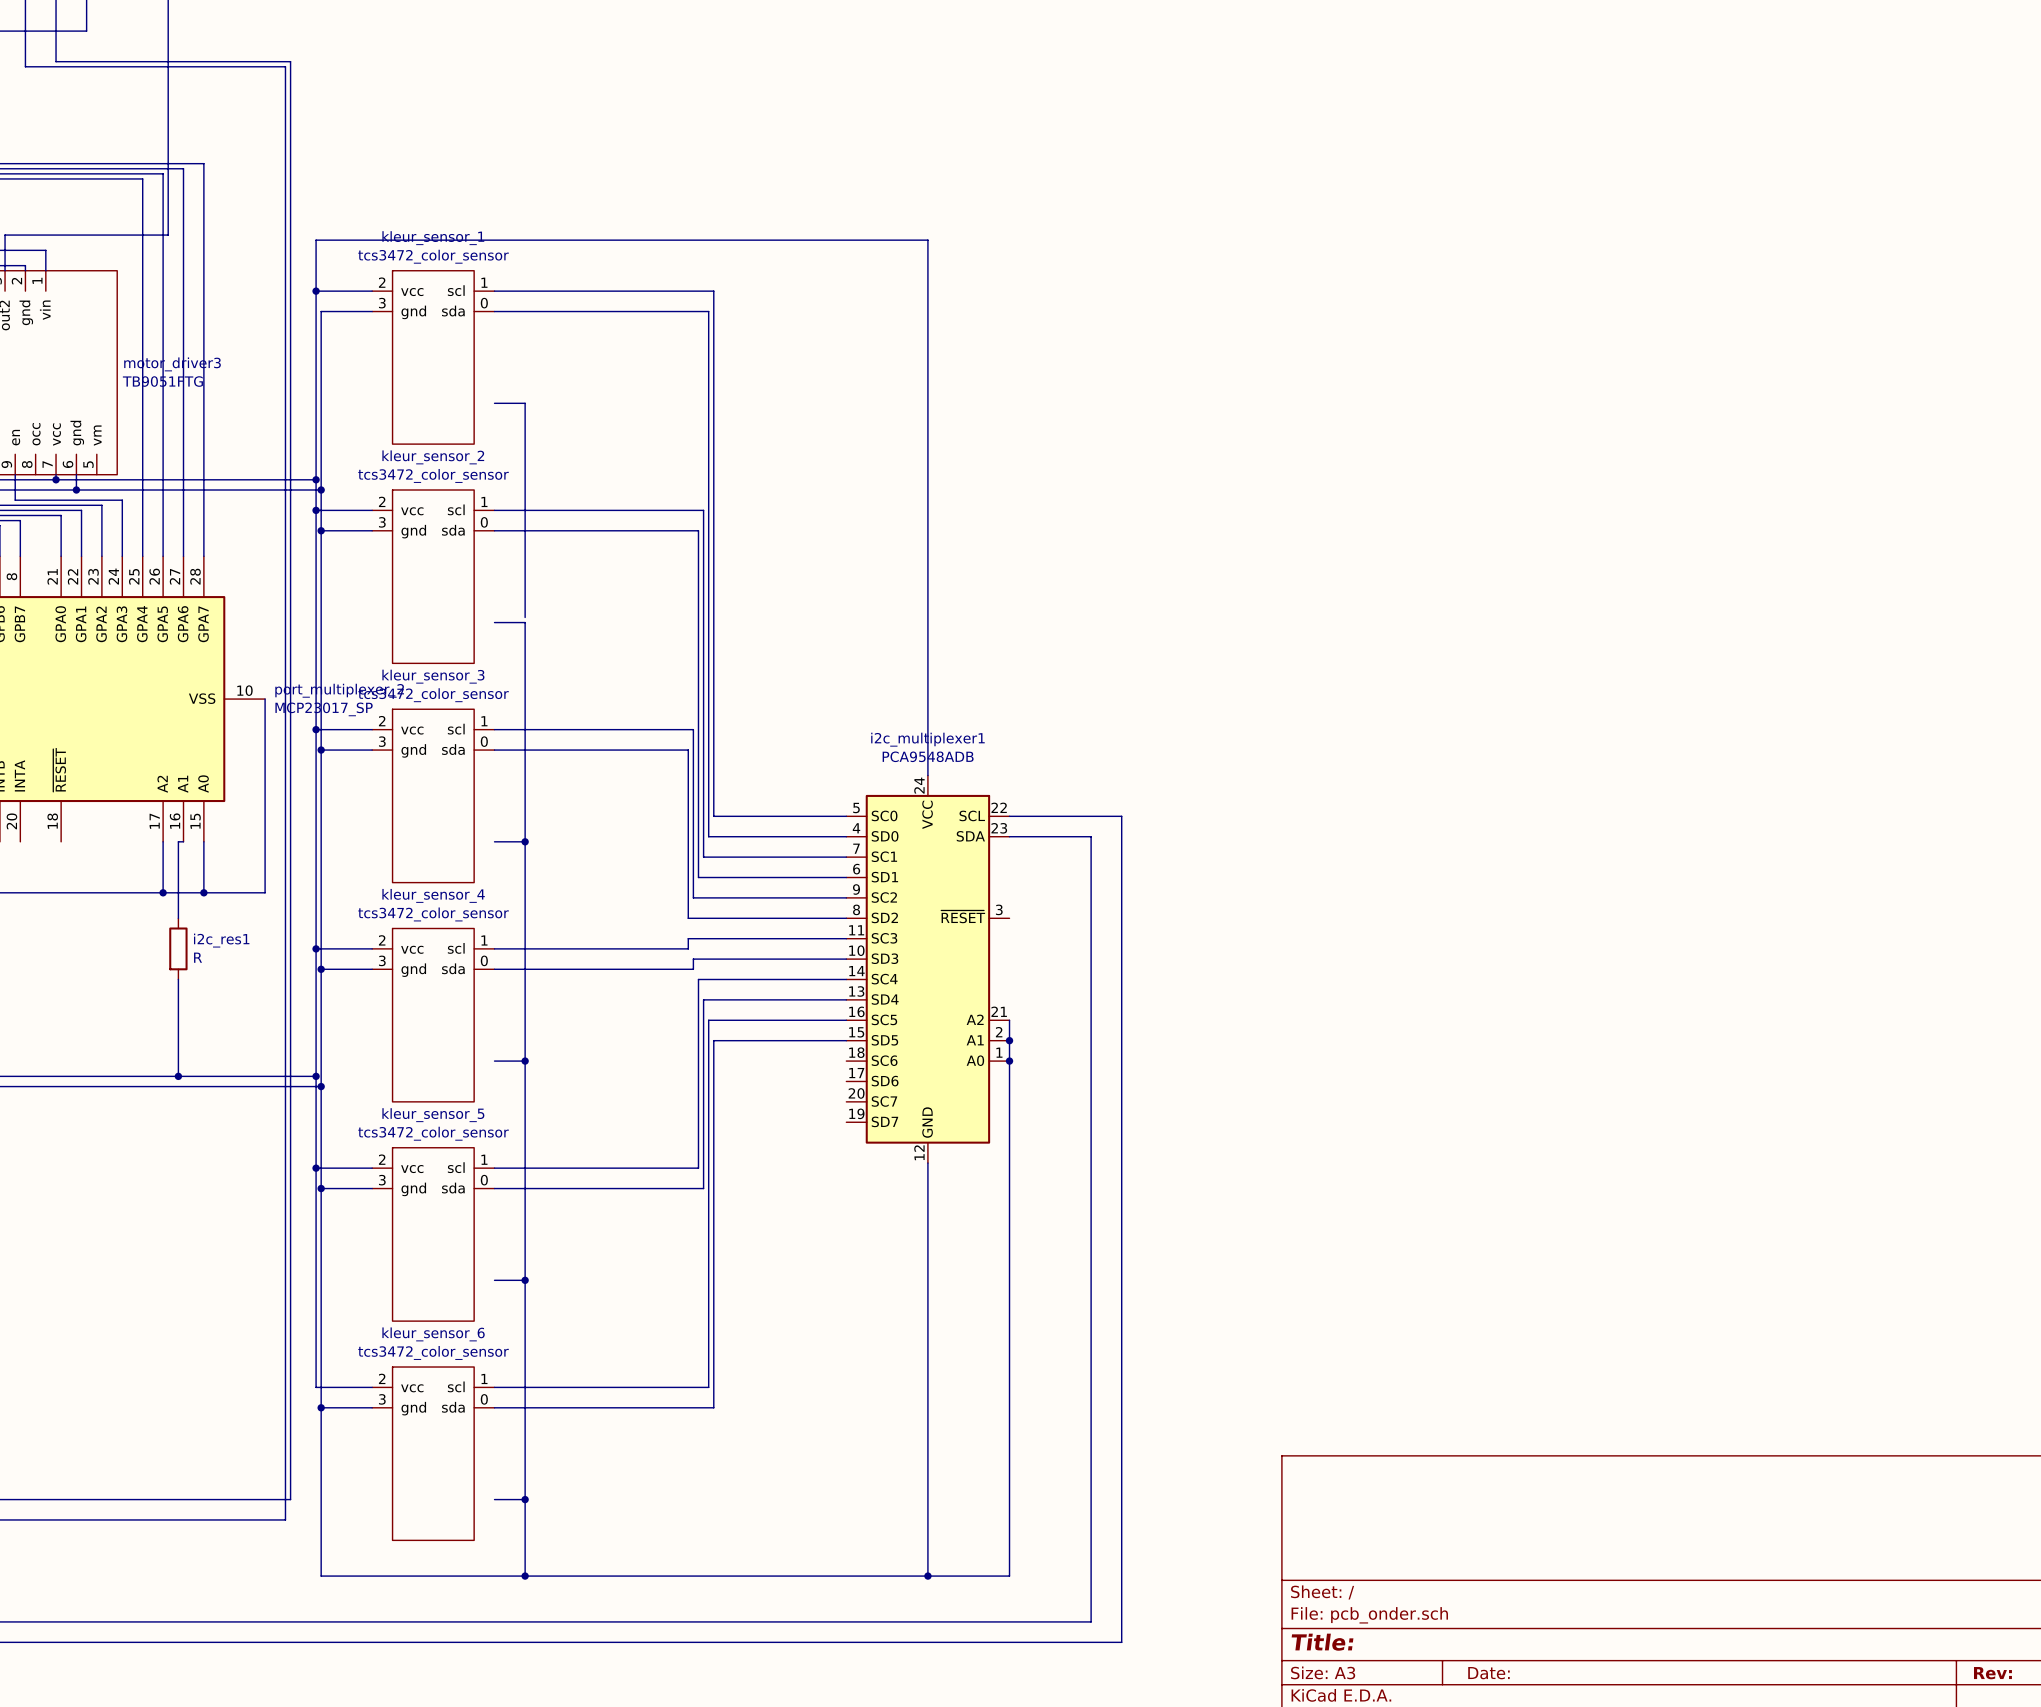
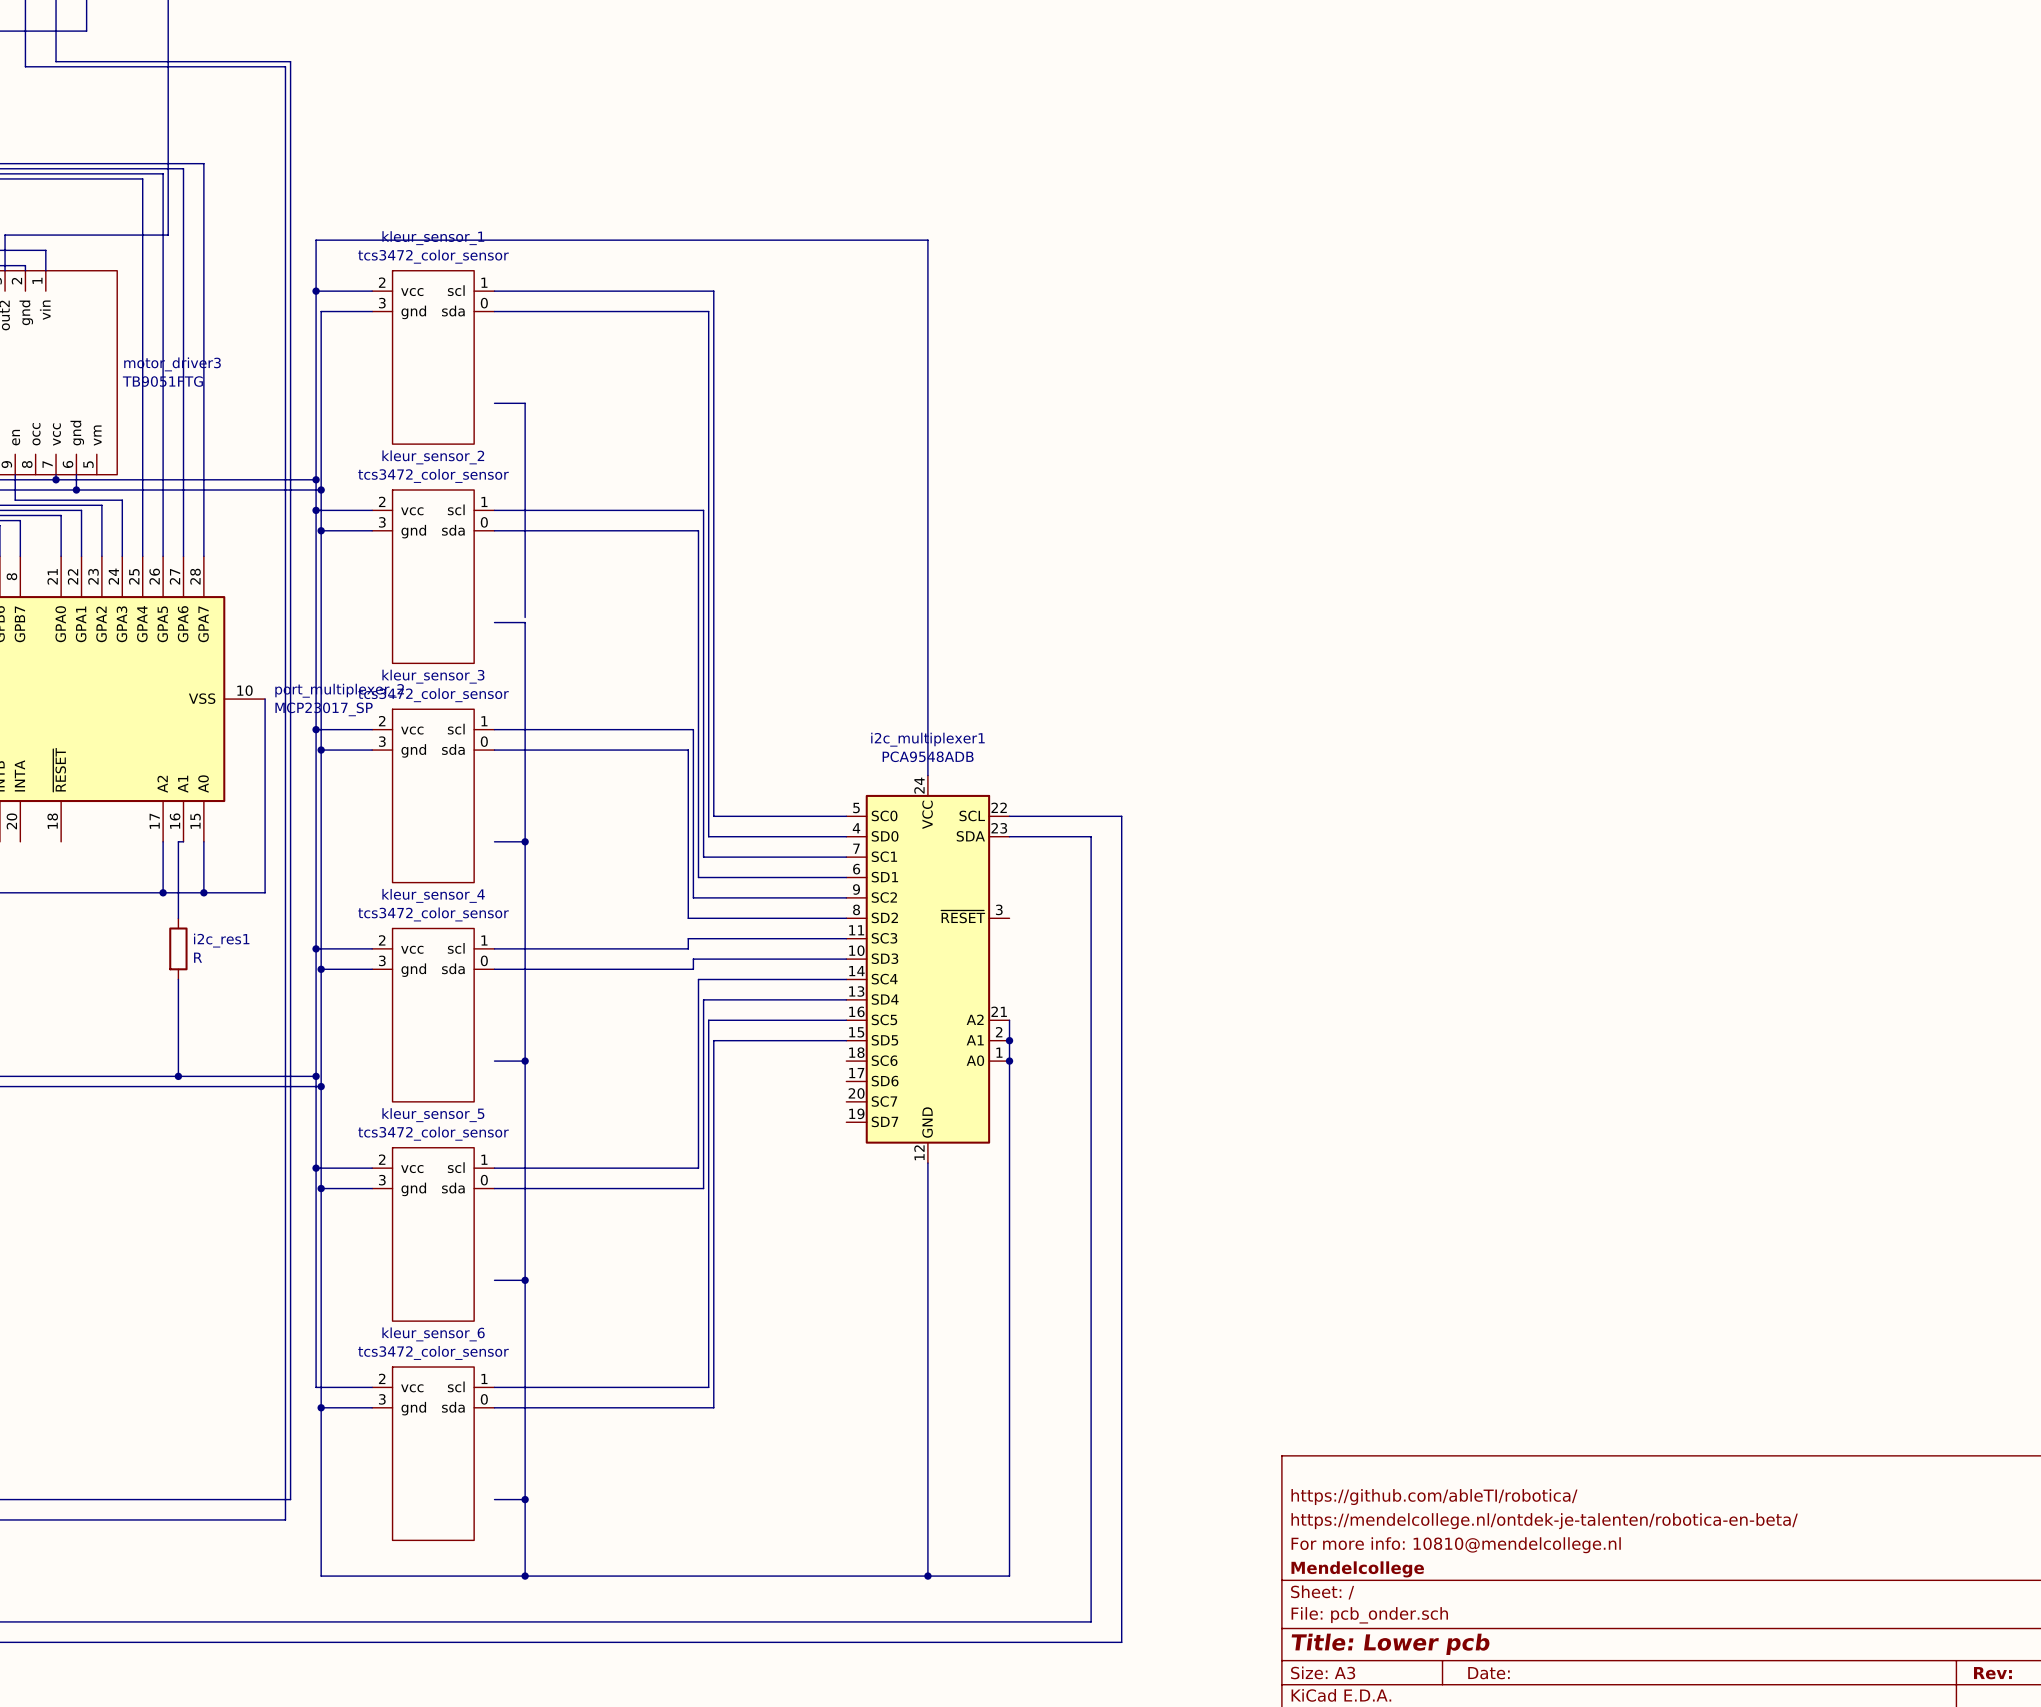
title block: none -> https://github.com/ableTI/robotica/ (1434, 1497)
title block: none -> https://mendelcollege.nl/ontdek-je-talenten/robotica-en-beta/ (1544, 1521)
title block: none -> For more info: 10810@mendelcollege.nl (1456, 1545)
title block: none -> Mendelcollege (1357, 1569)
title block: Title: (1322, 1642) -> Title: Lower pcb (1390, 1644)

